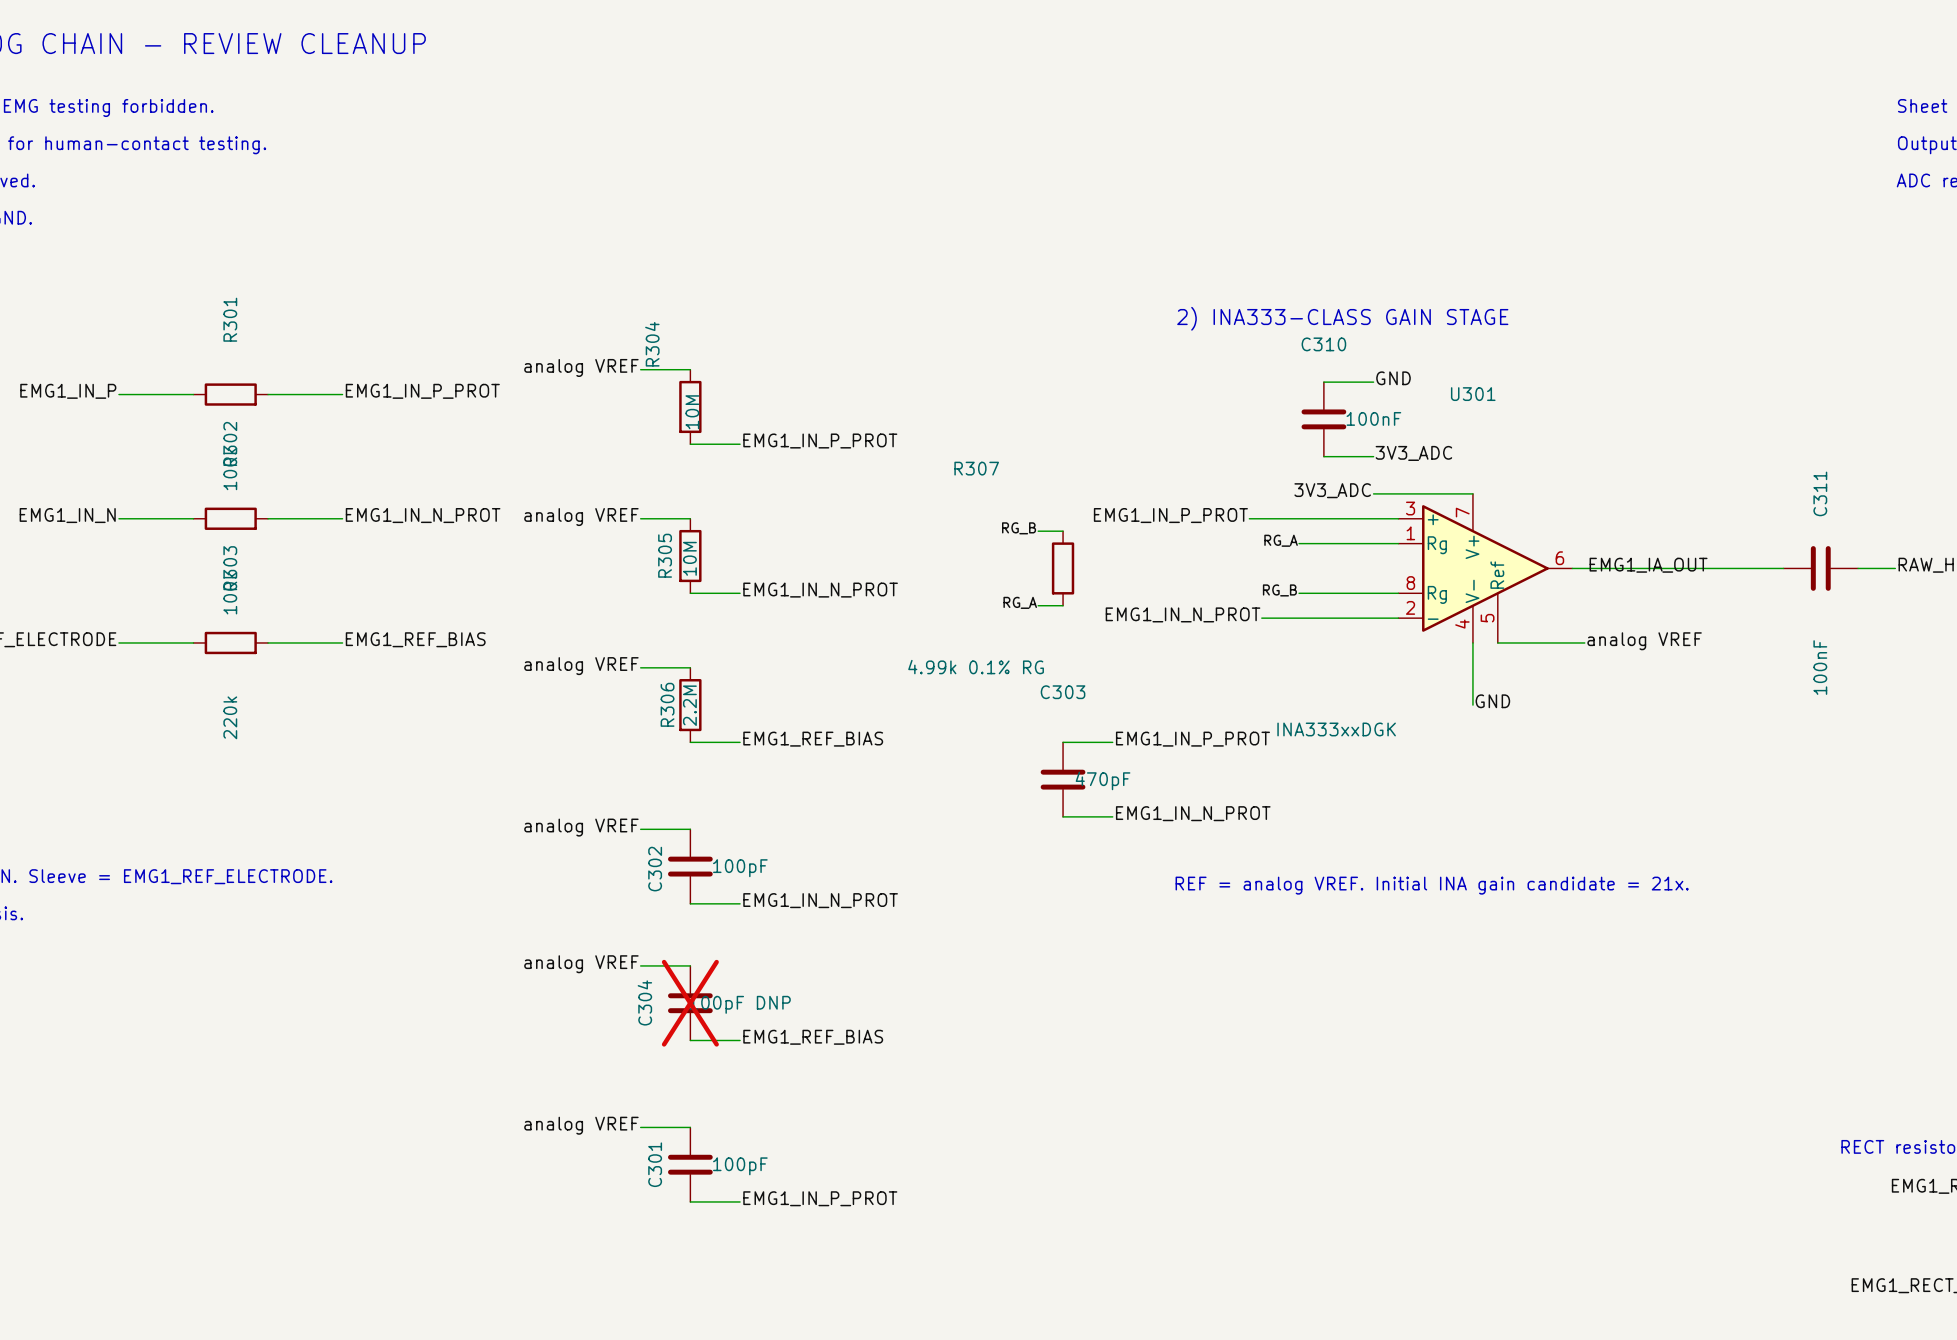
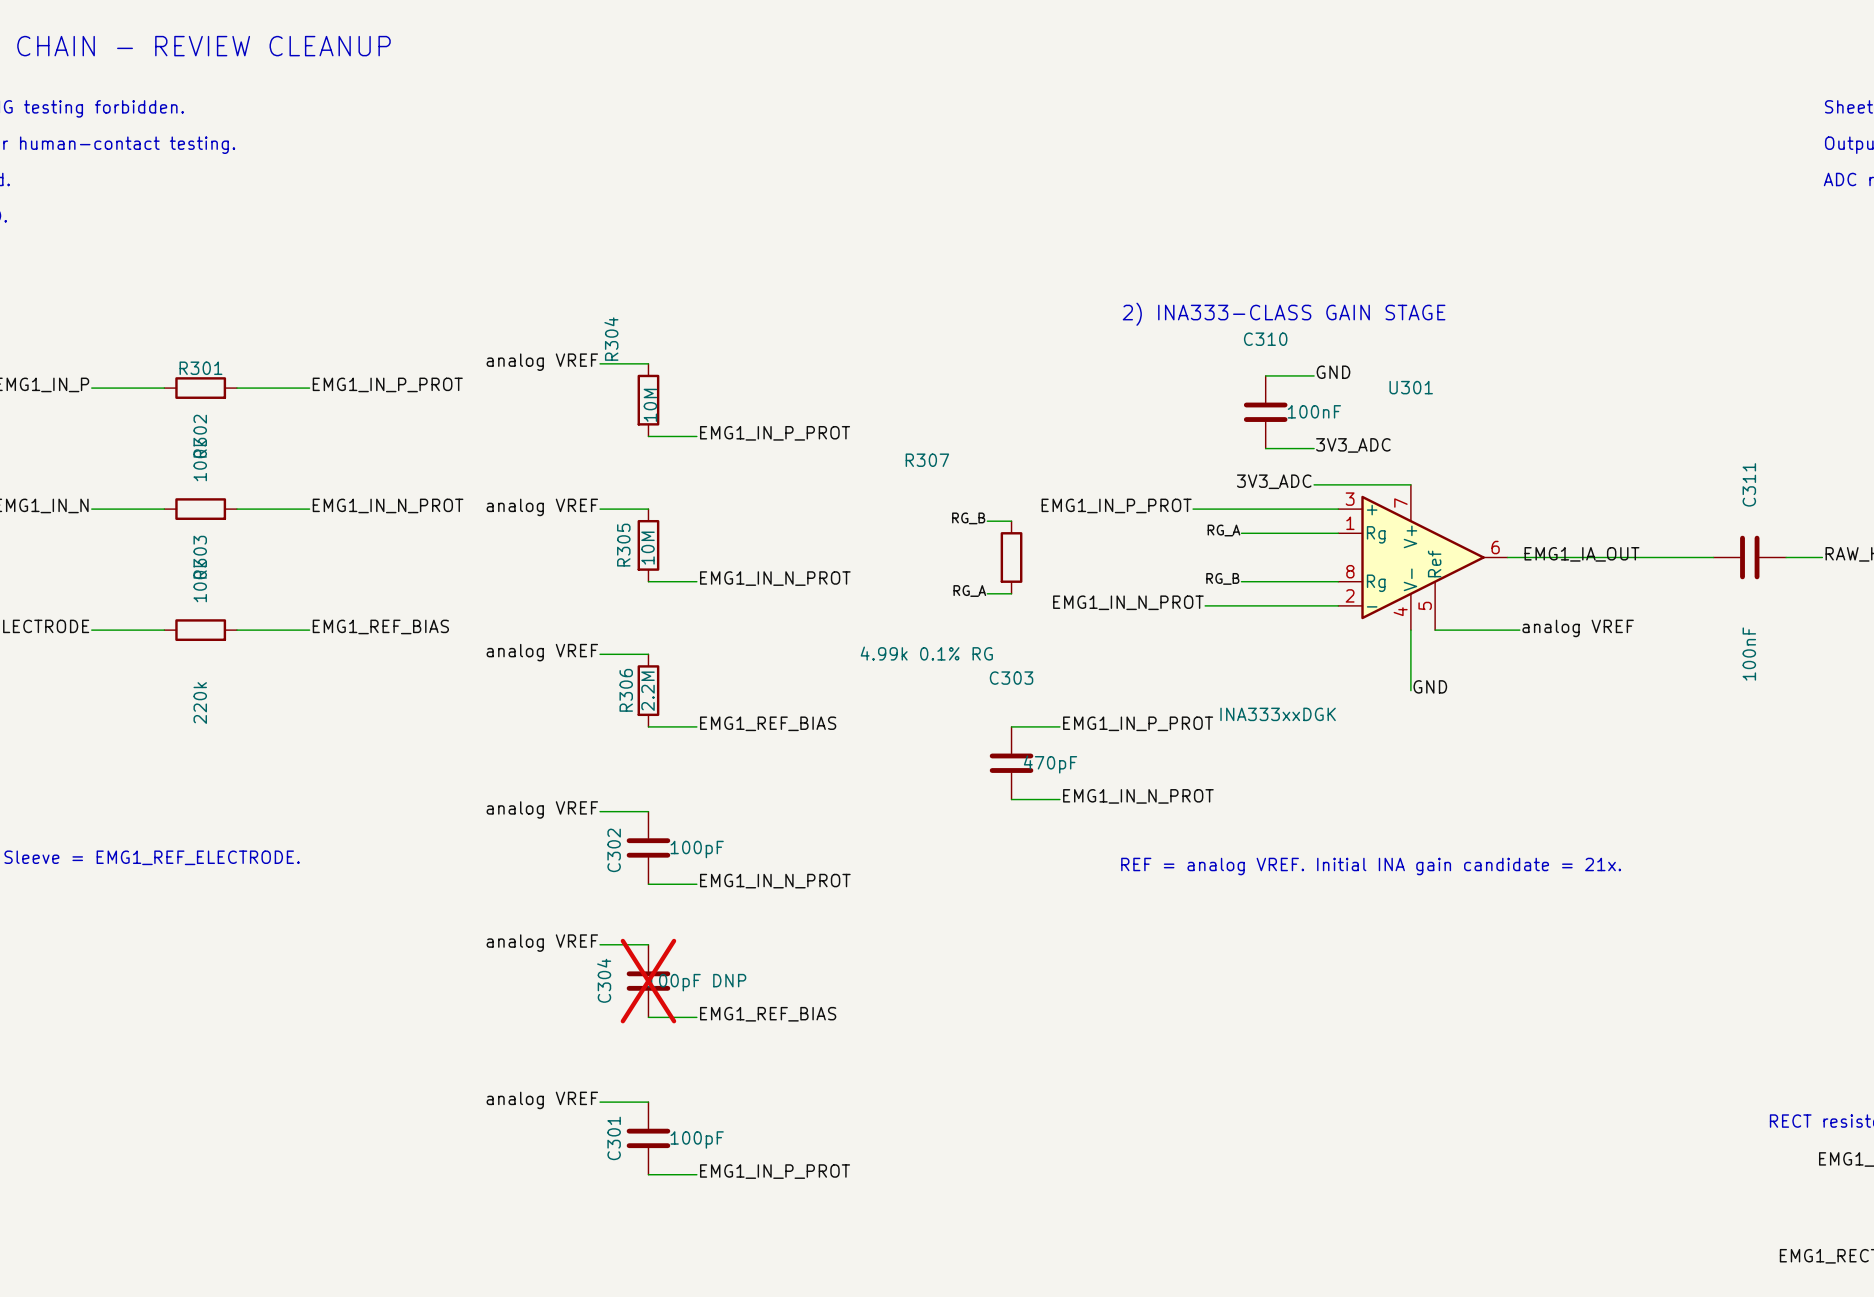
R301 name rotation: 0° (230, 319) -> 90° clockwise (200, 368)

